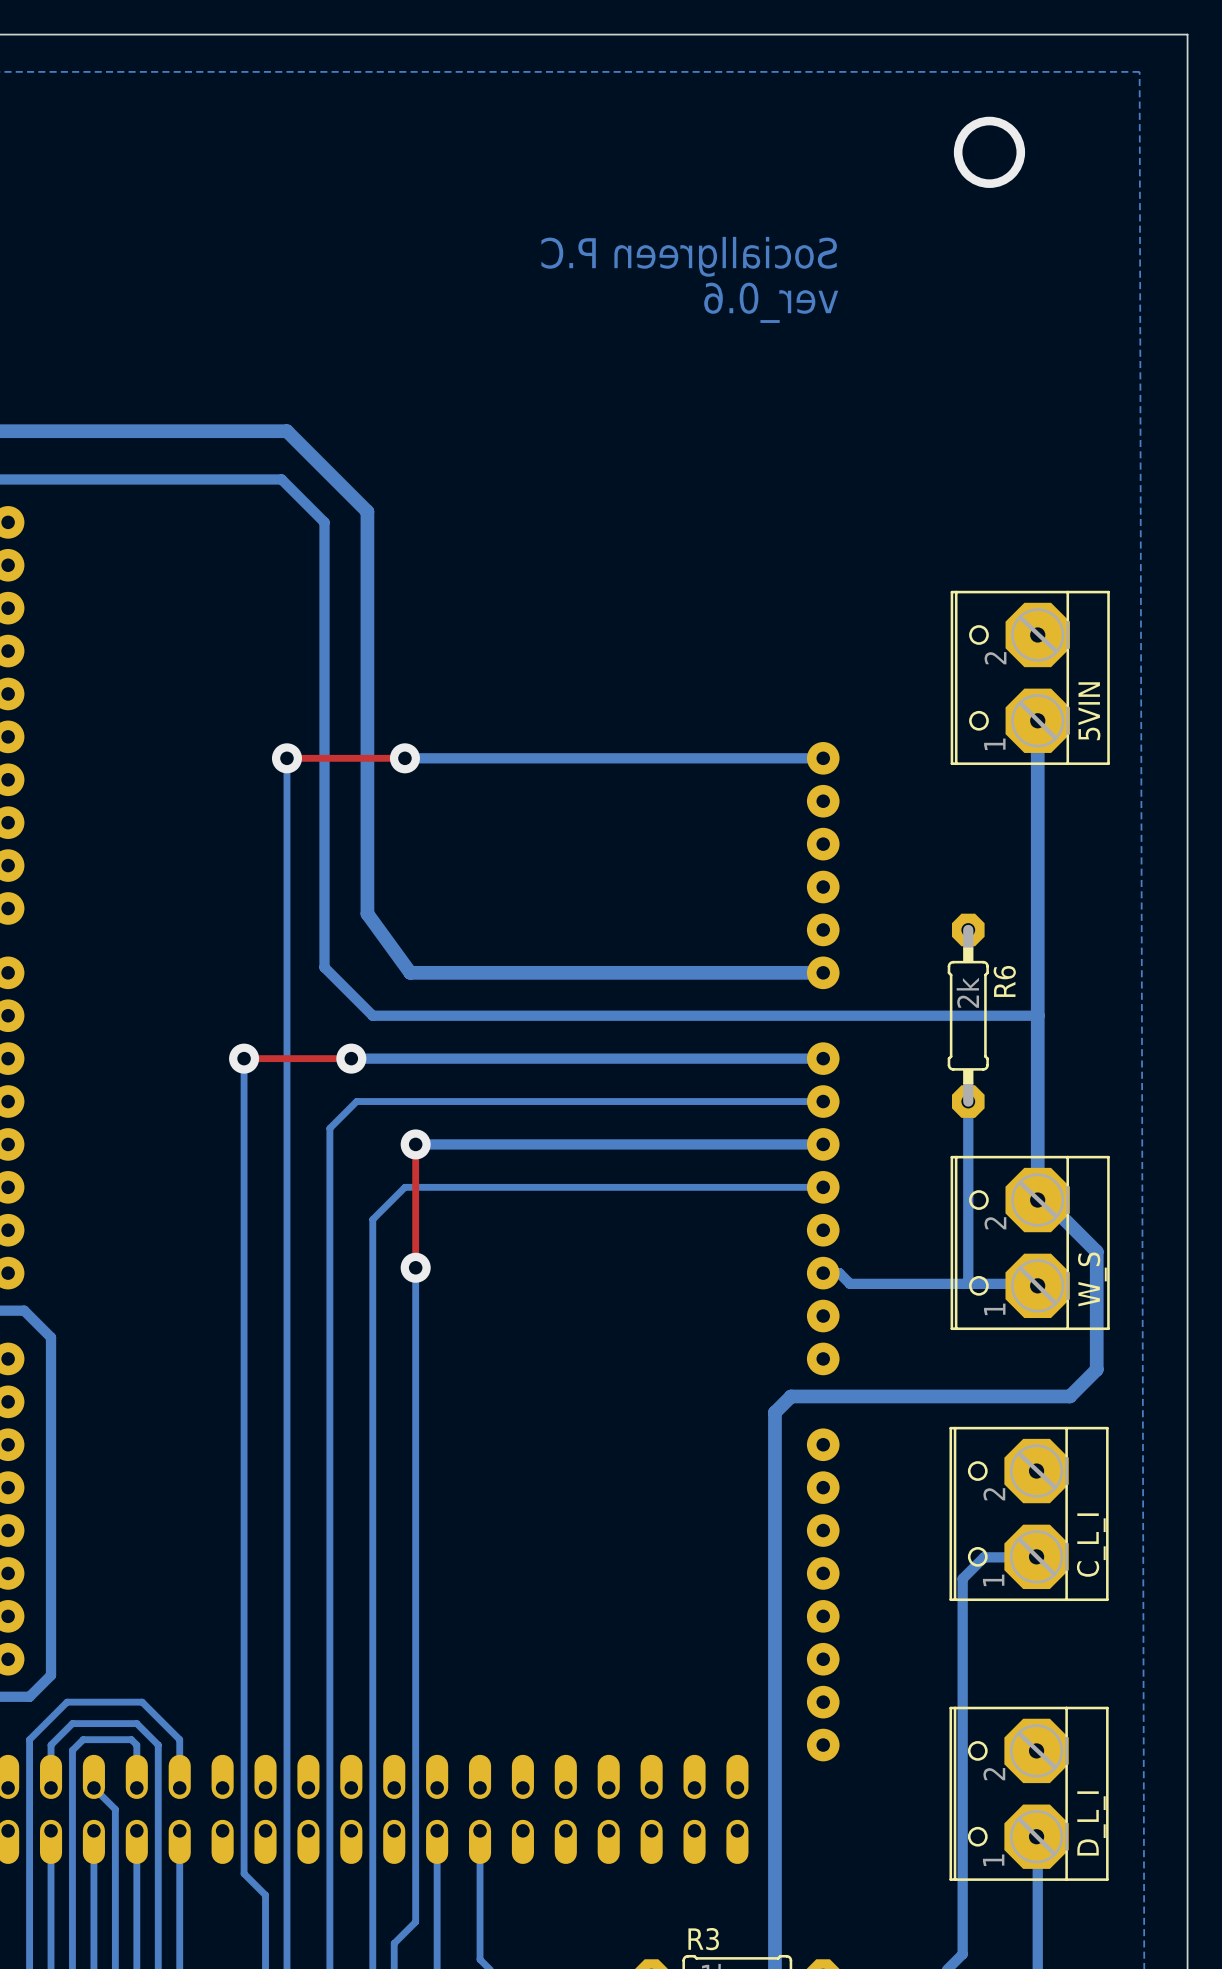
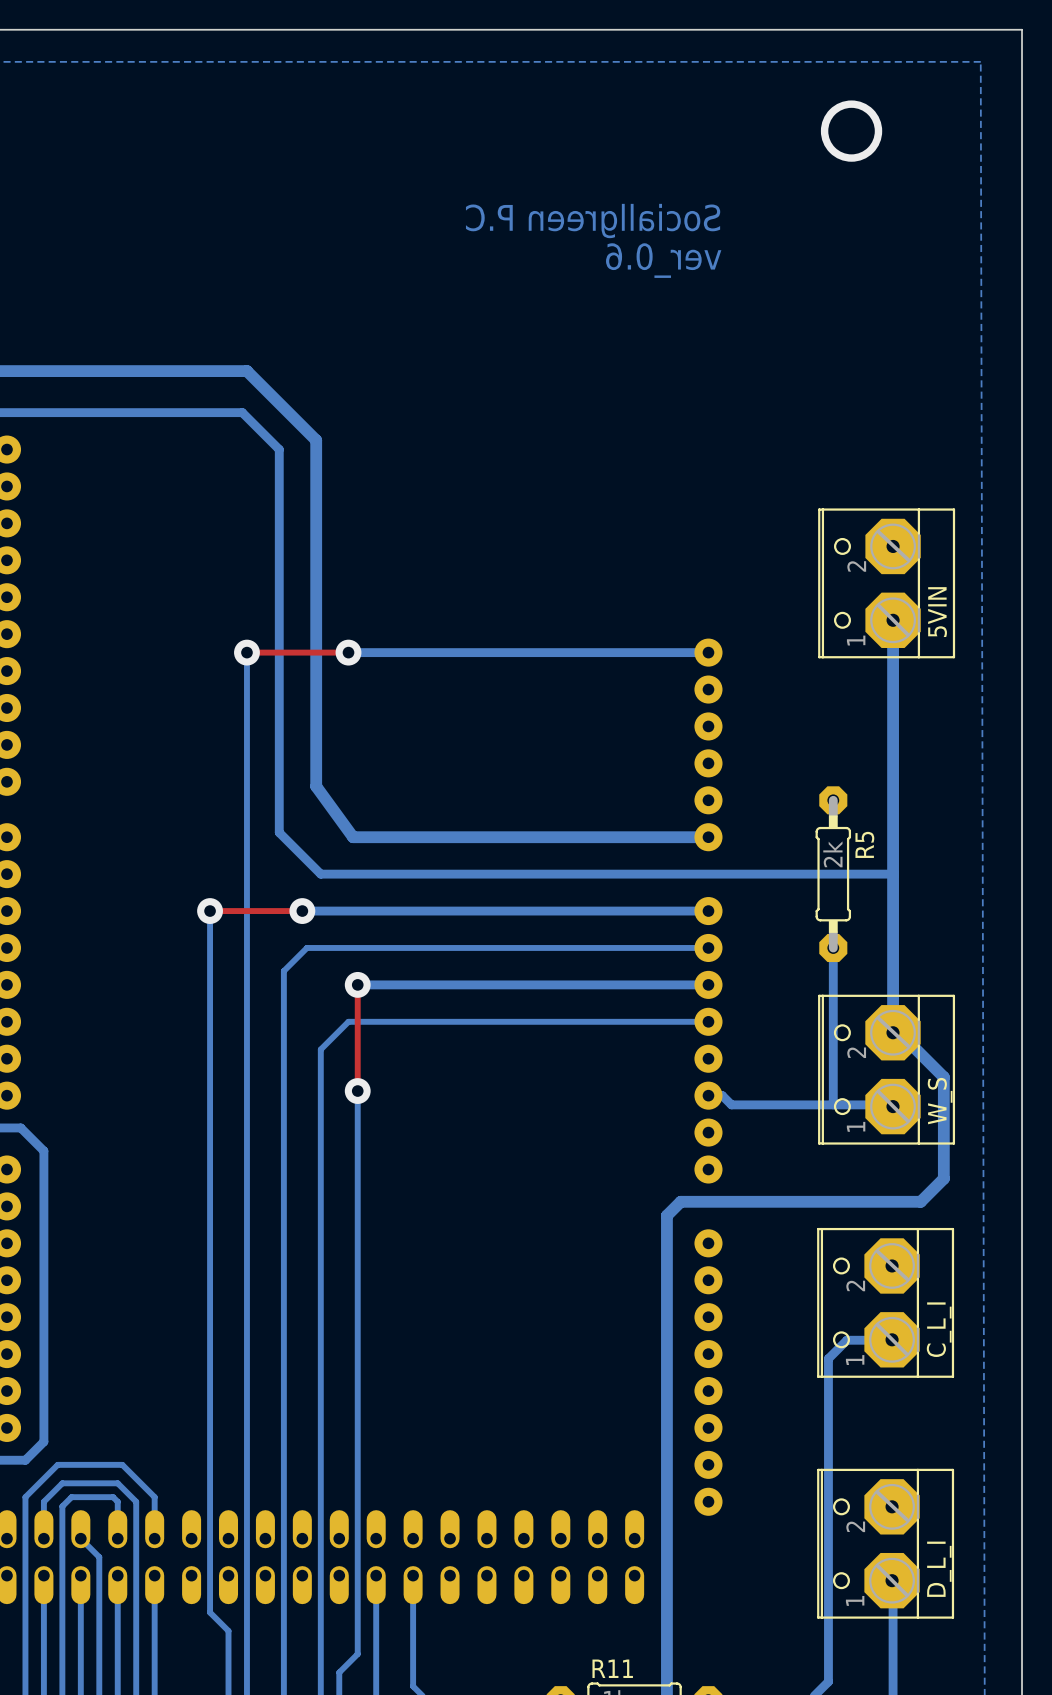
R6 name: R6 (1004, 981) -> R5 (864, 844)
R3 name: R3 (703, 1939) -> R11 (612, 1668)

